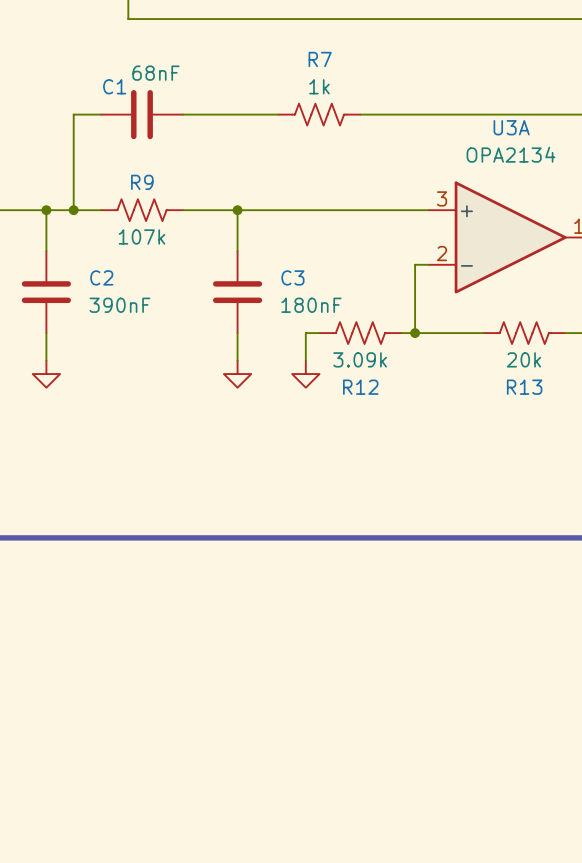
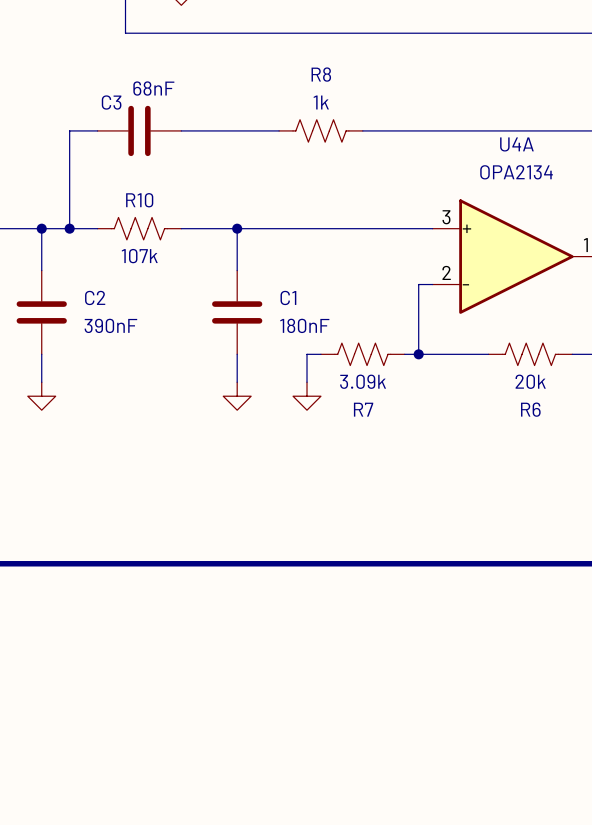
R7 name: R7 (320, 59) -> R8 (321, 74)
C1 name: C1 (114, 86) -> C3 (111, 102)
U3A name: U3A (511, 127) -> U4A (516, 144)
R9 name: R9 (142, 182) -> R10 (139, 200)
C3 name: C3 (292, 277) -> C1 (288, 297)
R12 name: R12 (360, 387) -> R7 (363, 409)
R13 name: R13 (524, 387) -> R6 (530, 409)

